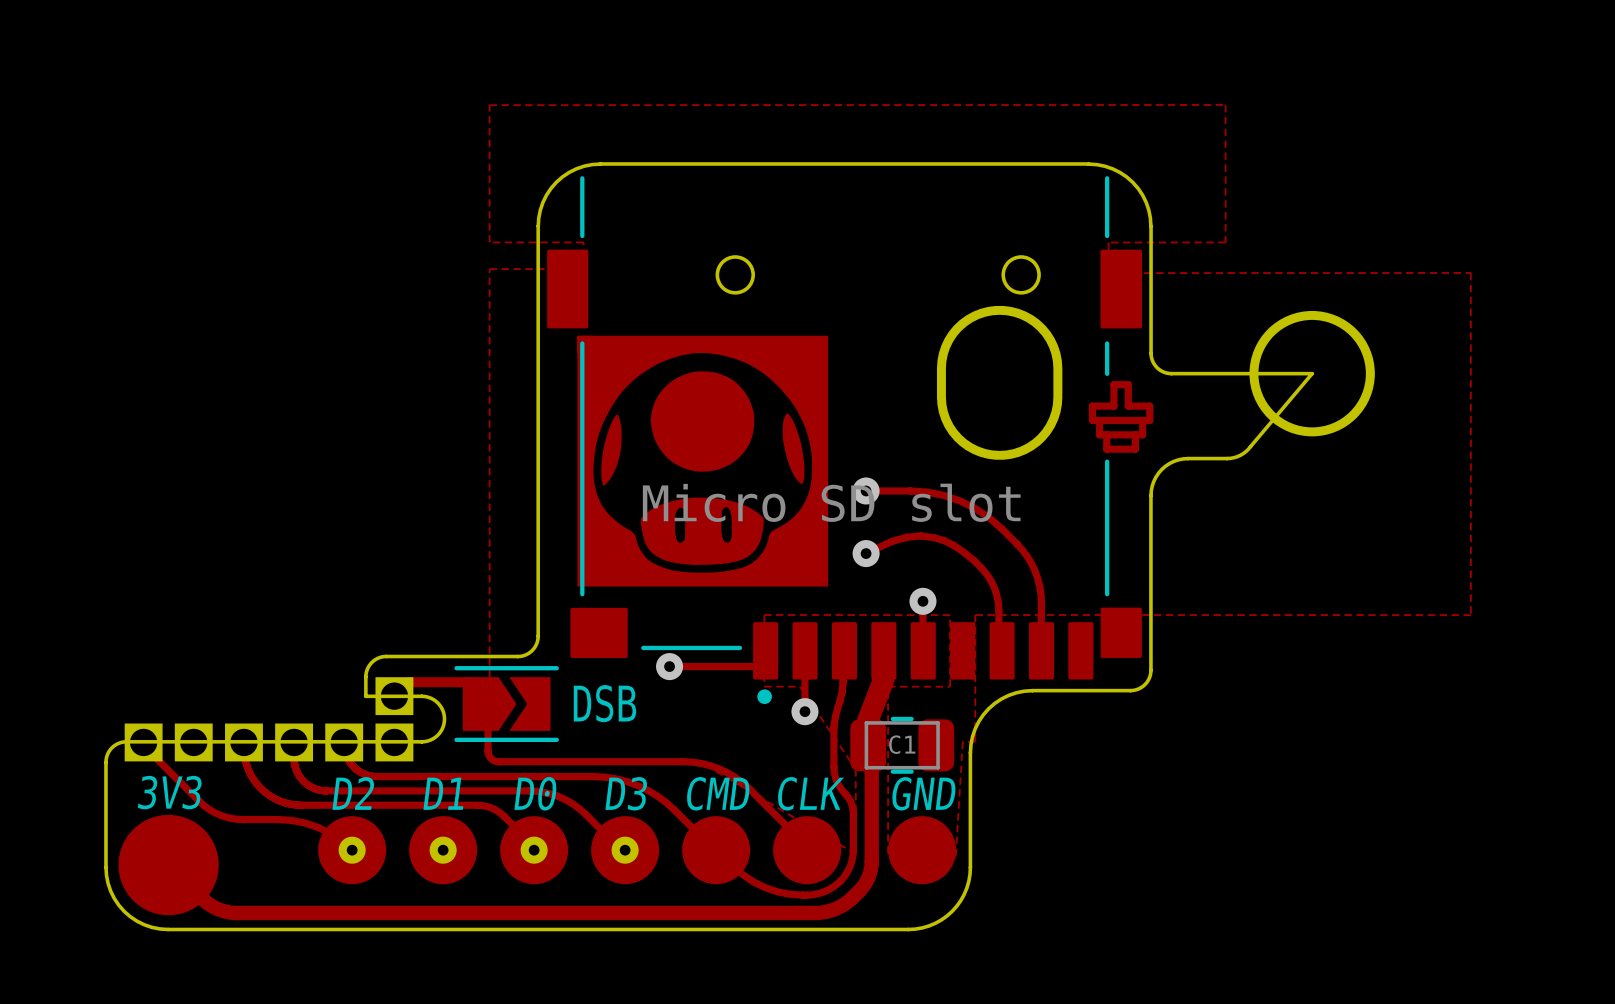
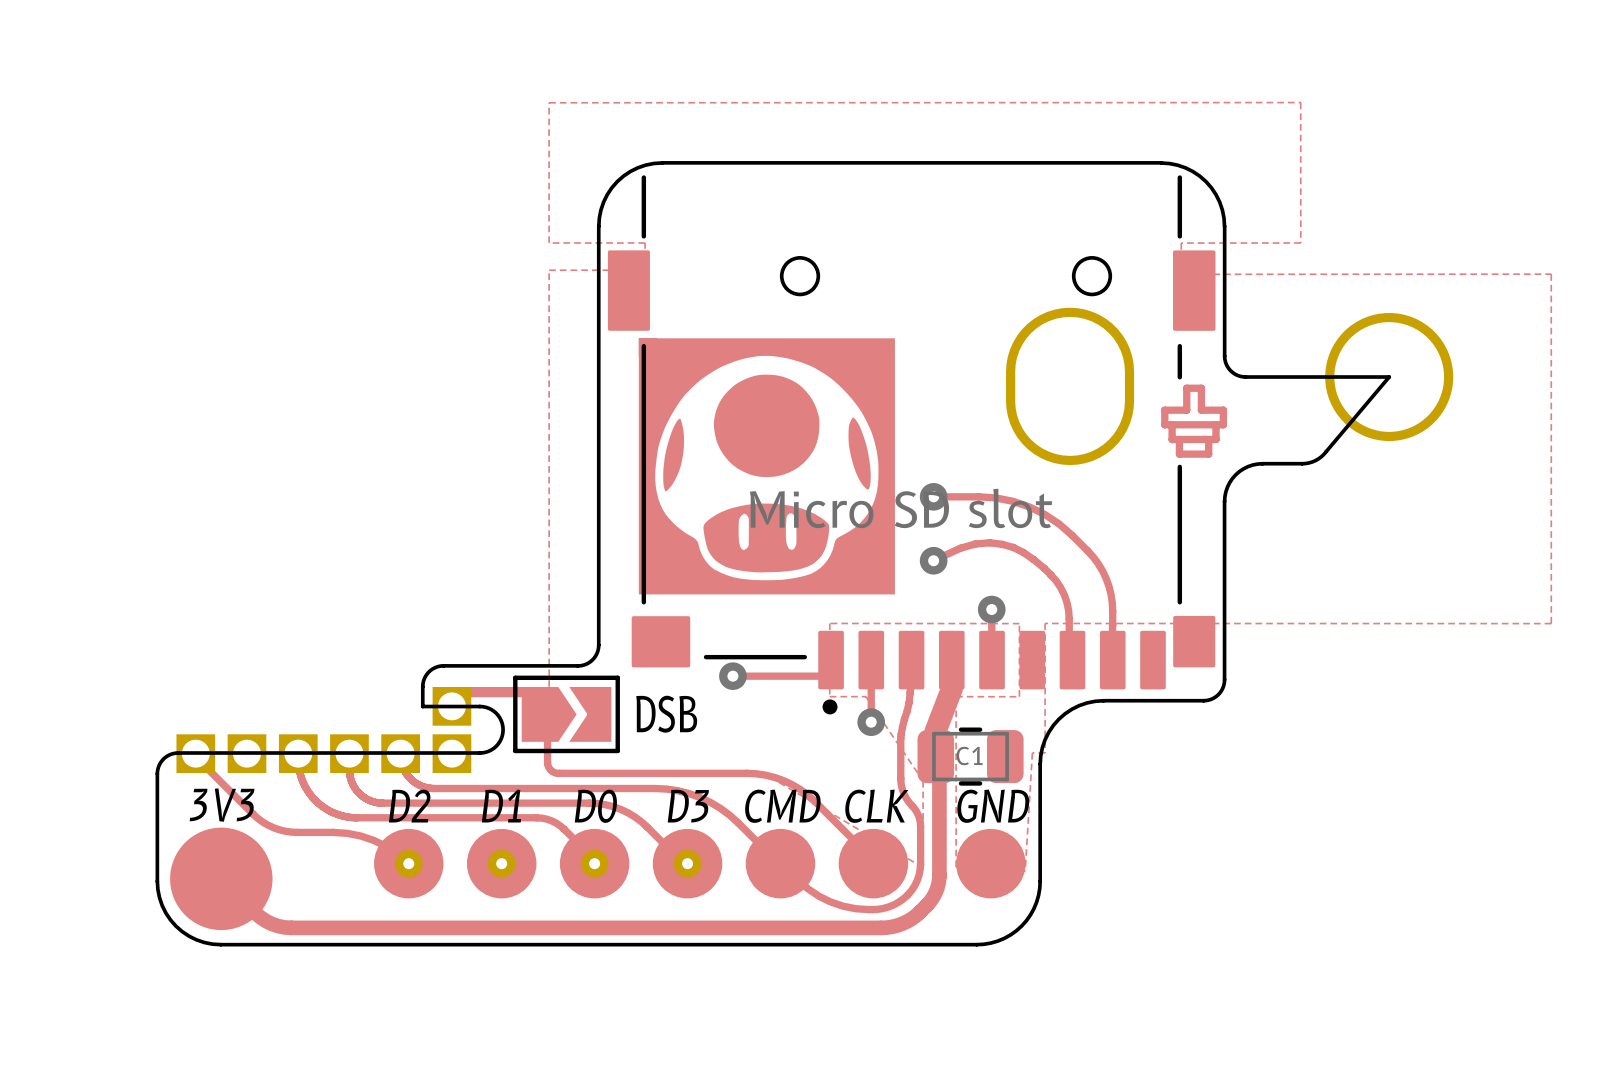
DSB footprint: [454, 666, 559, 742] -> [513, 675, 620, 754]

